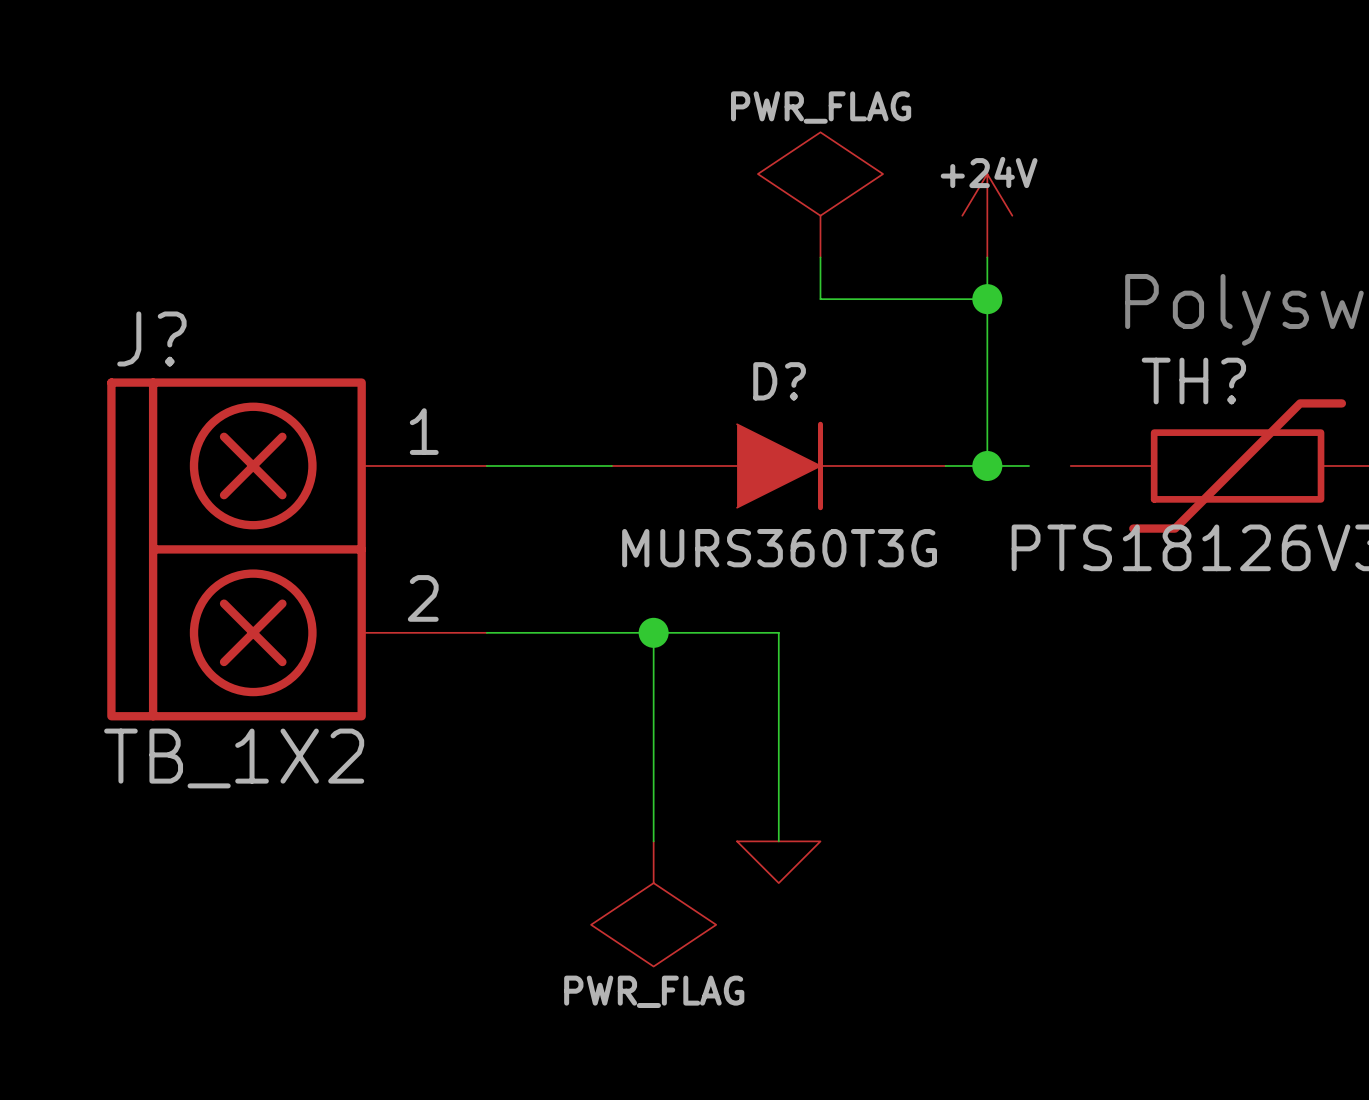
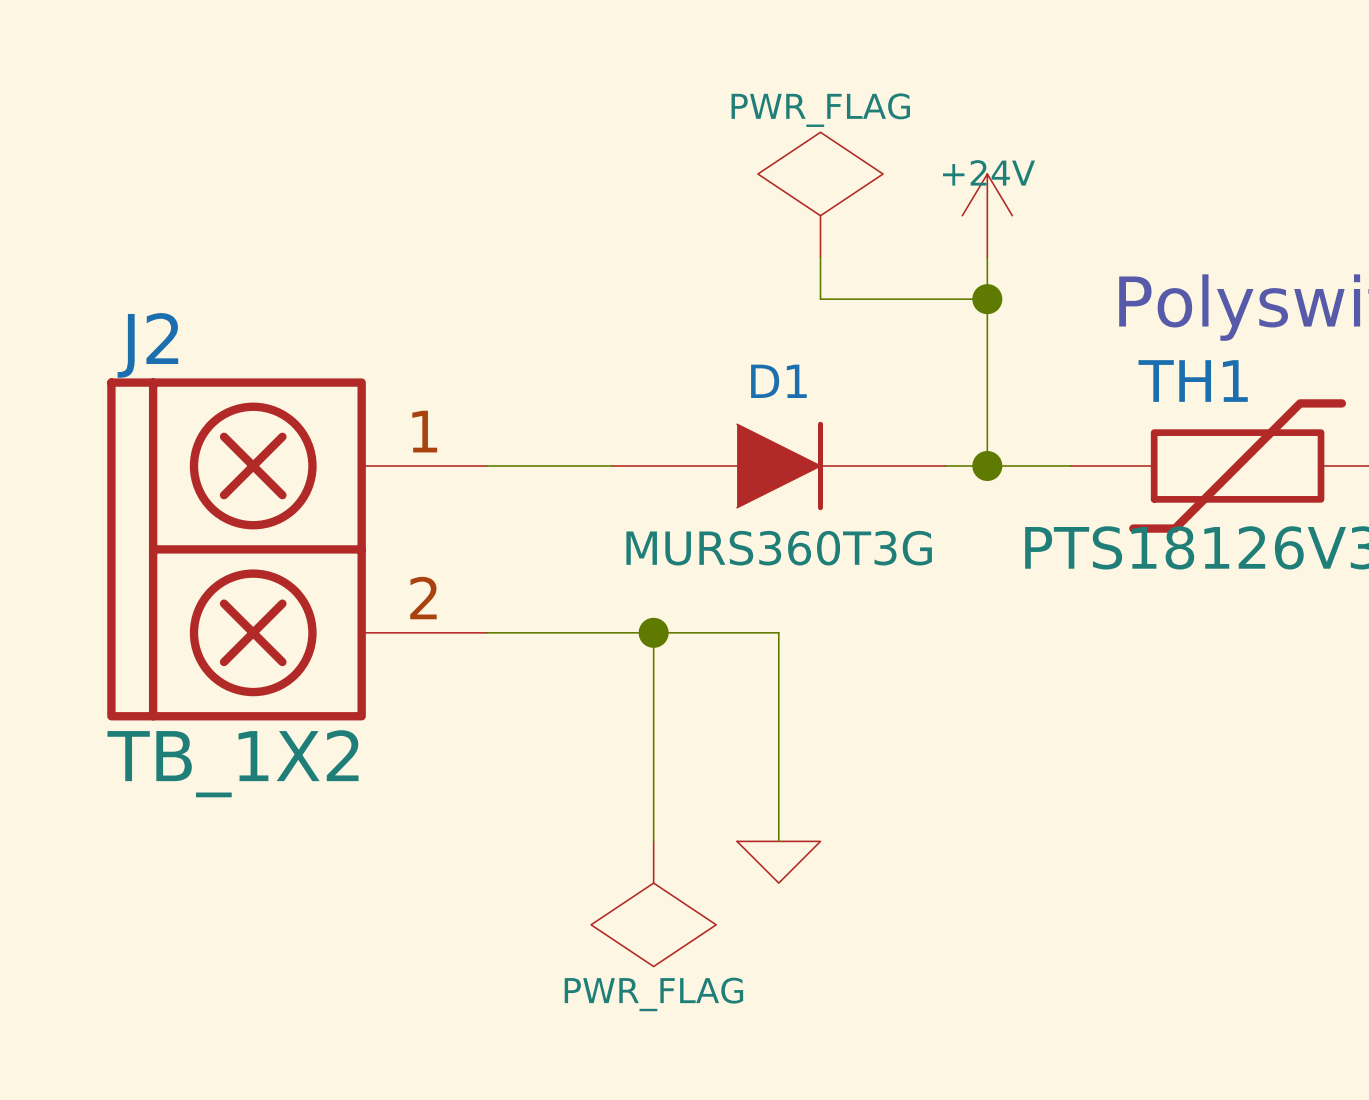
J? name: J? (151, 338) -> J2 (147, 345)
D? name: D? (779, 381) -> D1 (778, 381)
TH? name: TH? (1193, 381) -> TH1 (1193, 381)
wire: none -> (1029, 465) (1070, 465)

